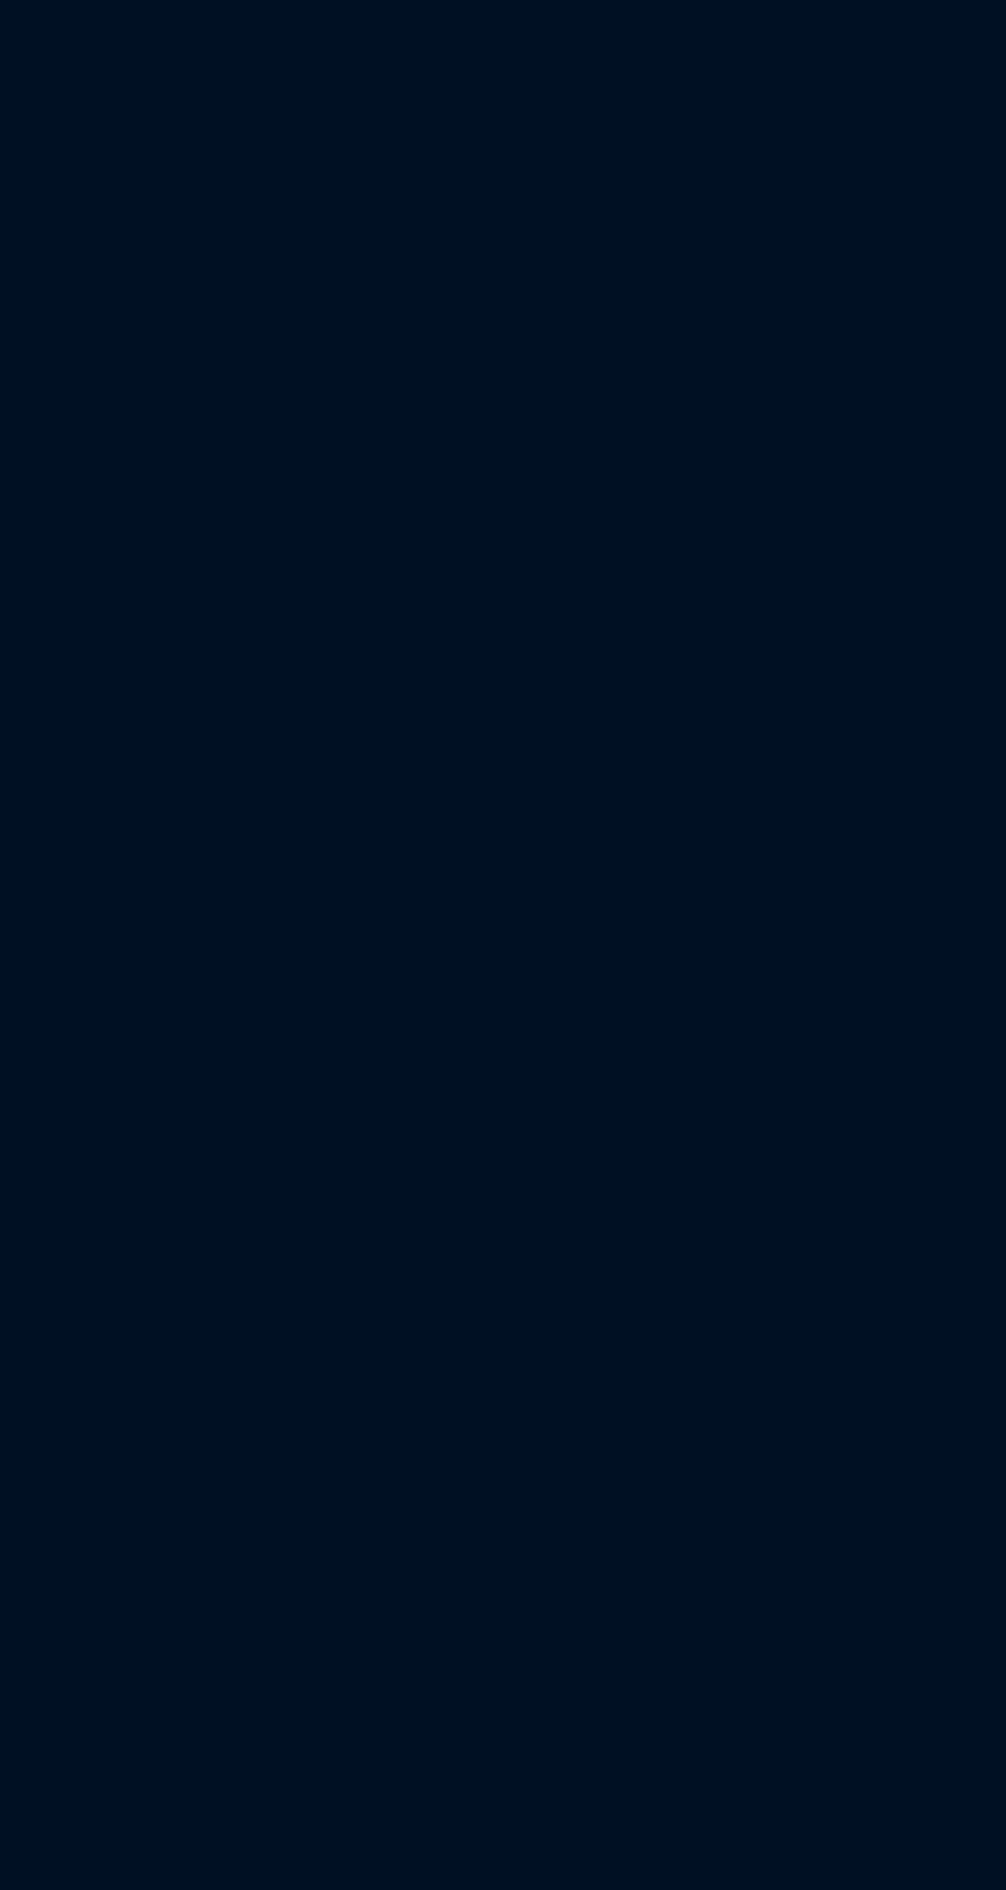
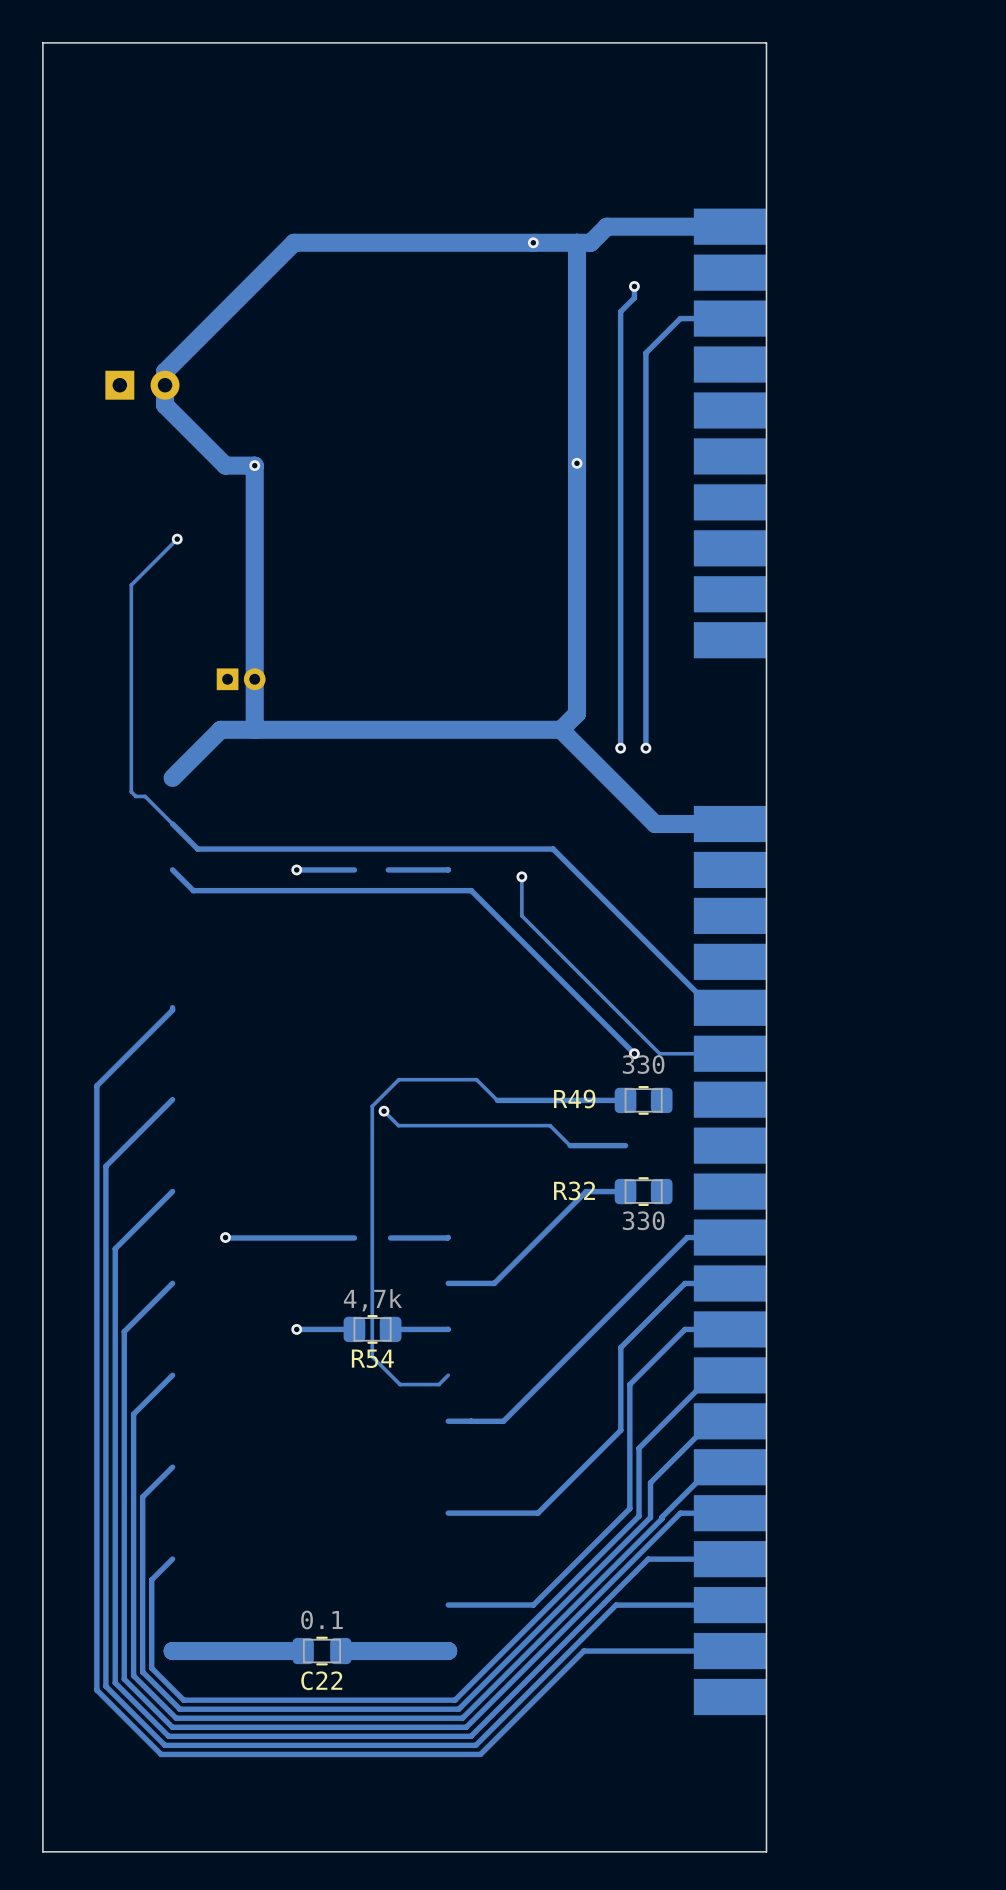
board edge: none -> (766, 42) (42, 42) (42, 1851) (766, 1851) (766, 42)
track: none -> (730, 226) (606, 226) (590, 242) (294, 242) (165, 371) (165, 405) (225, 465) (254, 465) (255, 729)
via: none -> (533, 242)
track: none -> (577, 242) (577, 713) (560, 729)
track: none -> (634, 286) (634, 297) (620, 311) (620, 748)
via: none -> (634, 286)
track: none -> (730, 318) (680, 318) (645, 353) (645, 748)
part: none -> (142, 385)
part: none -> (730, 433)
via: none -> (577, 463)
via: none -> (254, 465)
track: none -> (177, 539) (131, 585) (131, 791) (135, 796) (145, 796) (197, 849) (553, 849) (711, 1007) (730, 1007)
via: none -> (177, 539)
part: none -> (241, 679)
track: none -> (560, 729) (220, 729) (172, 777)
track: none -> (560, 729) (655, 824) (730, 824)
via: none -> (620, 748)
via: none -> (645, 748)
track: none -> (172, 869) (193, 890) (471, 890) (634, 1053)
via: none -> (296, 869)
track: none -> (354, 869) (296, 869)
track: none -> (448, 869) (388, 869)
track: none -> (521, 876) (521, 915) (659, 1053) (730, 1053)
via: none -> (521, 876)
track: none -> (172, 1007) (172, 1010) (96, 1085) (96, 1690) (161, 1754) (480, 1754) (583, 1651) (730, 1651)
via: none -> (634, 1053)
track: none -> (172, 1099) (105, 1166) (105, 1686) (164, 1745) (475, 1745) (616, 1605) (730, 1605)
track: none -> (625, 1100) (497, 1100) (476, 1079) (398, 1079) (372, 1106) (372, 1356) (400, 1384) (438, 1384) (448, 1375)
R49: none -> 330 (643, 1100)
track: none -> (384, 1111) (398, 1125) (550, 1125) (570, 1145) (625, 1145)
via: none -> (384, 1111)
track: none -> (172, 1191) (115, 1248) (115, 1682) (168, 1736) (471, 1736) (648, 1559) (730, 1559)
track: none -> (625, 1191) (586, 1191) (494, 1283)
R32: none -> 330 (643, 1191)
track: none -> (225, 1237) (354, 1237)
via: none -> (225, 1237)
track: none -> (448, 1237) (390, 1237)
track: none -> (730, 1237) (687, 1237) (503, 1421) (471, 1421)
part: none -> (730, 1260)
track: none -> (172, 1283) (124, 1331) (124, 1679) (172, 1727) (466, 1727) (680, 1513) (730, 1513)
track: none -> (494, 1283) (448, 1283)
track: none -> (730, 1283) (684, 1283) (620, 1347) (620, 1430) (538, 1513) (448, 1513)
via: none -> (296, 1329)
track: none -> (354, 1329) (296, 1329)
R54: none -> 4,7k (372, 1329)
track: none -> (448, 1329) (390, 1329)
track: none -> (730, 1329) (684, 1329) (629, 1384) (629, 1508) (533, 1605) (448, 1605)
track: none -> (172, 1375) (133, 1414) (133, 1675) (176, 1718) (462, 1718) (711, 1467) (730, 1467)
track: none -> (730, 1375) (711, 1375) (639, 1448) (639, 1516) (455, 1700) (183, 1700) (151, 1668) (151, 1579) (172, 1559)
track: none -> (471, 1421) (448, 1421)
track: none -> (730, 1421) (711, 1421) (650, 1482) (650, 1517) (458, 1709) (179, 1709) (142, 1671) (142, 1497) (172, 1467)
track: none -> (303, 1651) (172, 1651)
C22: none -> 0.1 (321, 1651)
track: none -> (448, 1651) (340, 1651)

